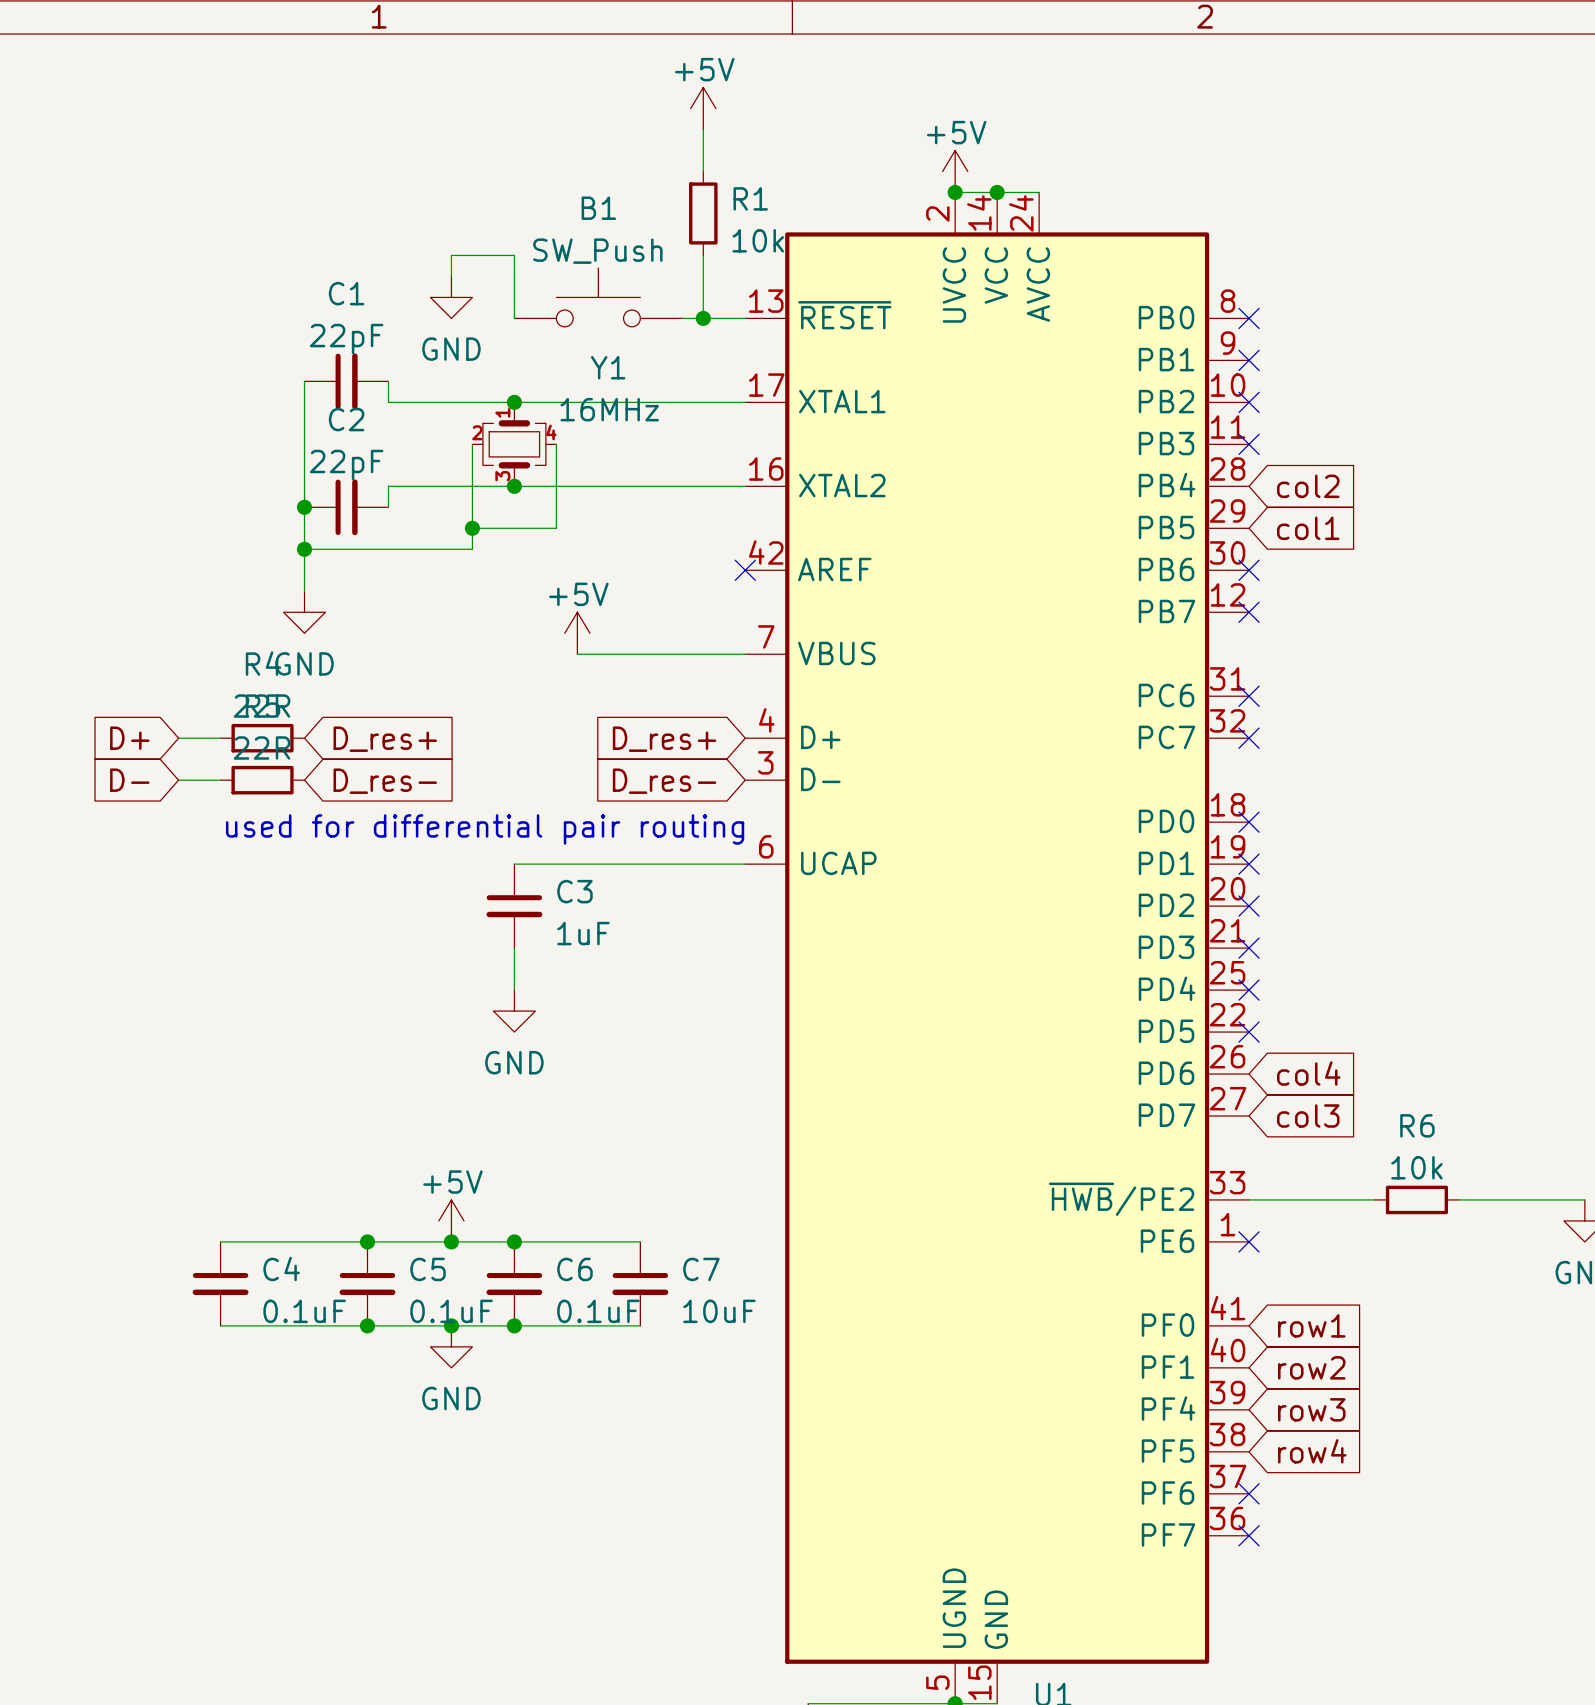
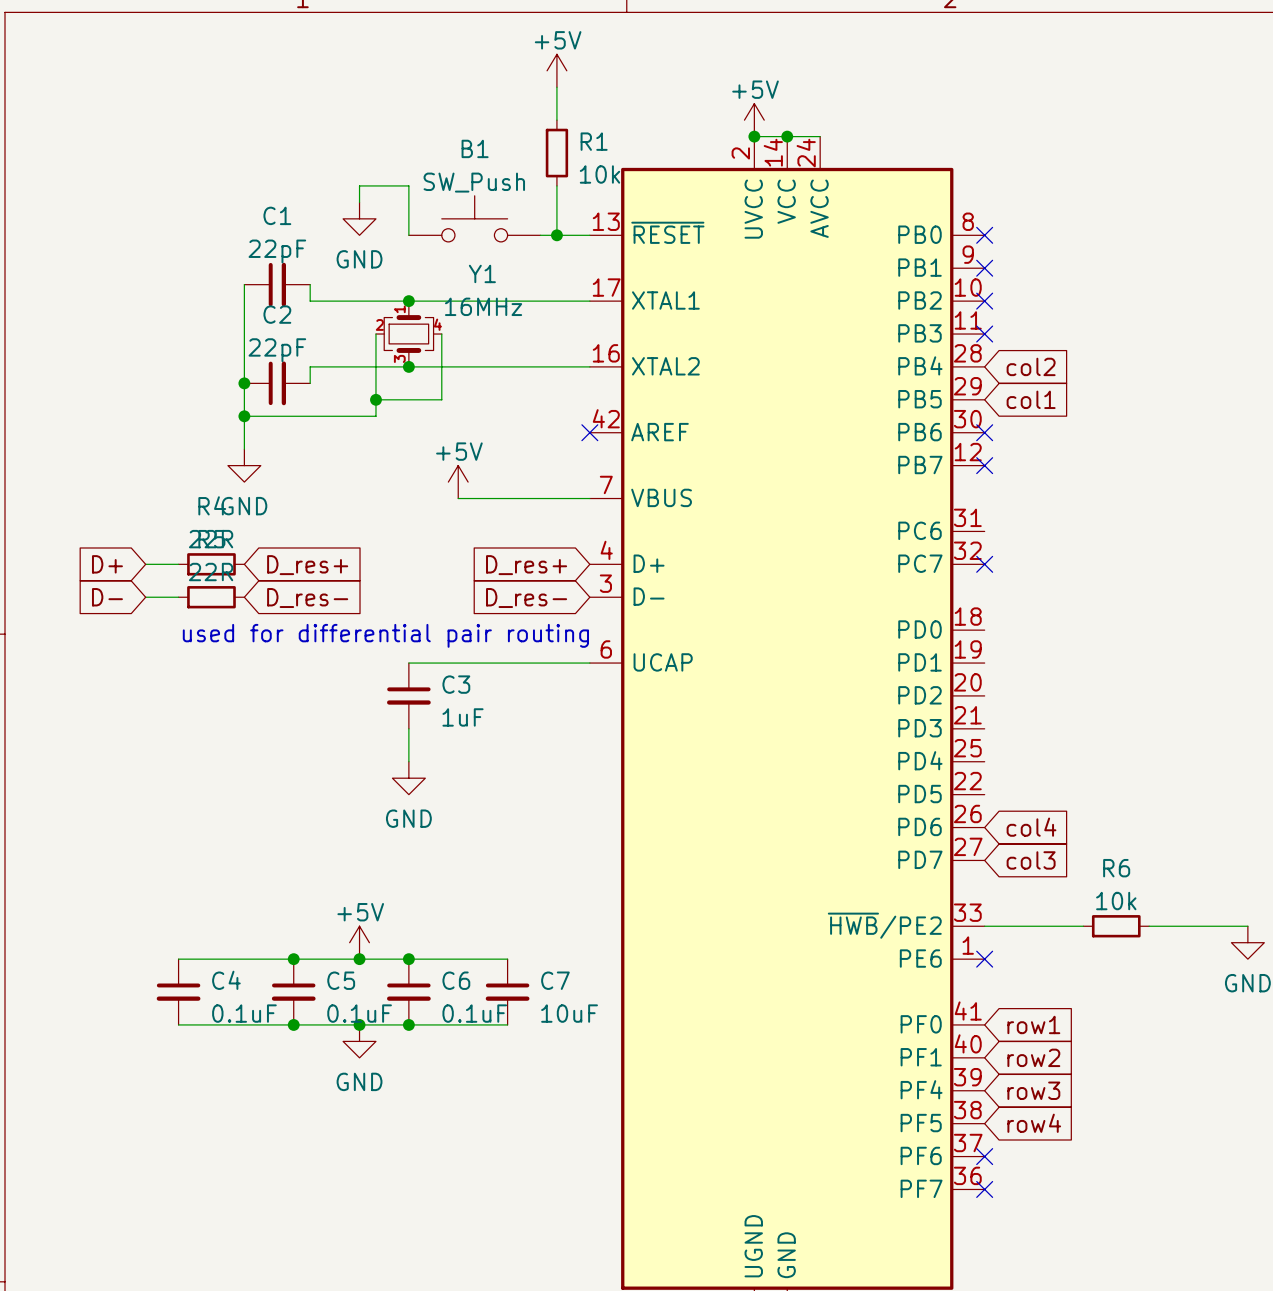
no-connect mark: (1249, 696) -> none
no-connect mark: (1249, 822) -> none
no-connect mark: (1249, 864) -> none
no-connect mark: (1249, 906) -> none
no-connect mark: (1249, 948) -> none
no-connect mark: (1249, 990) -> none
no-connect mark: (1249, 1032) -> none

